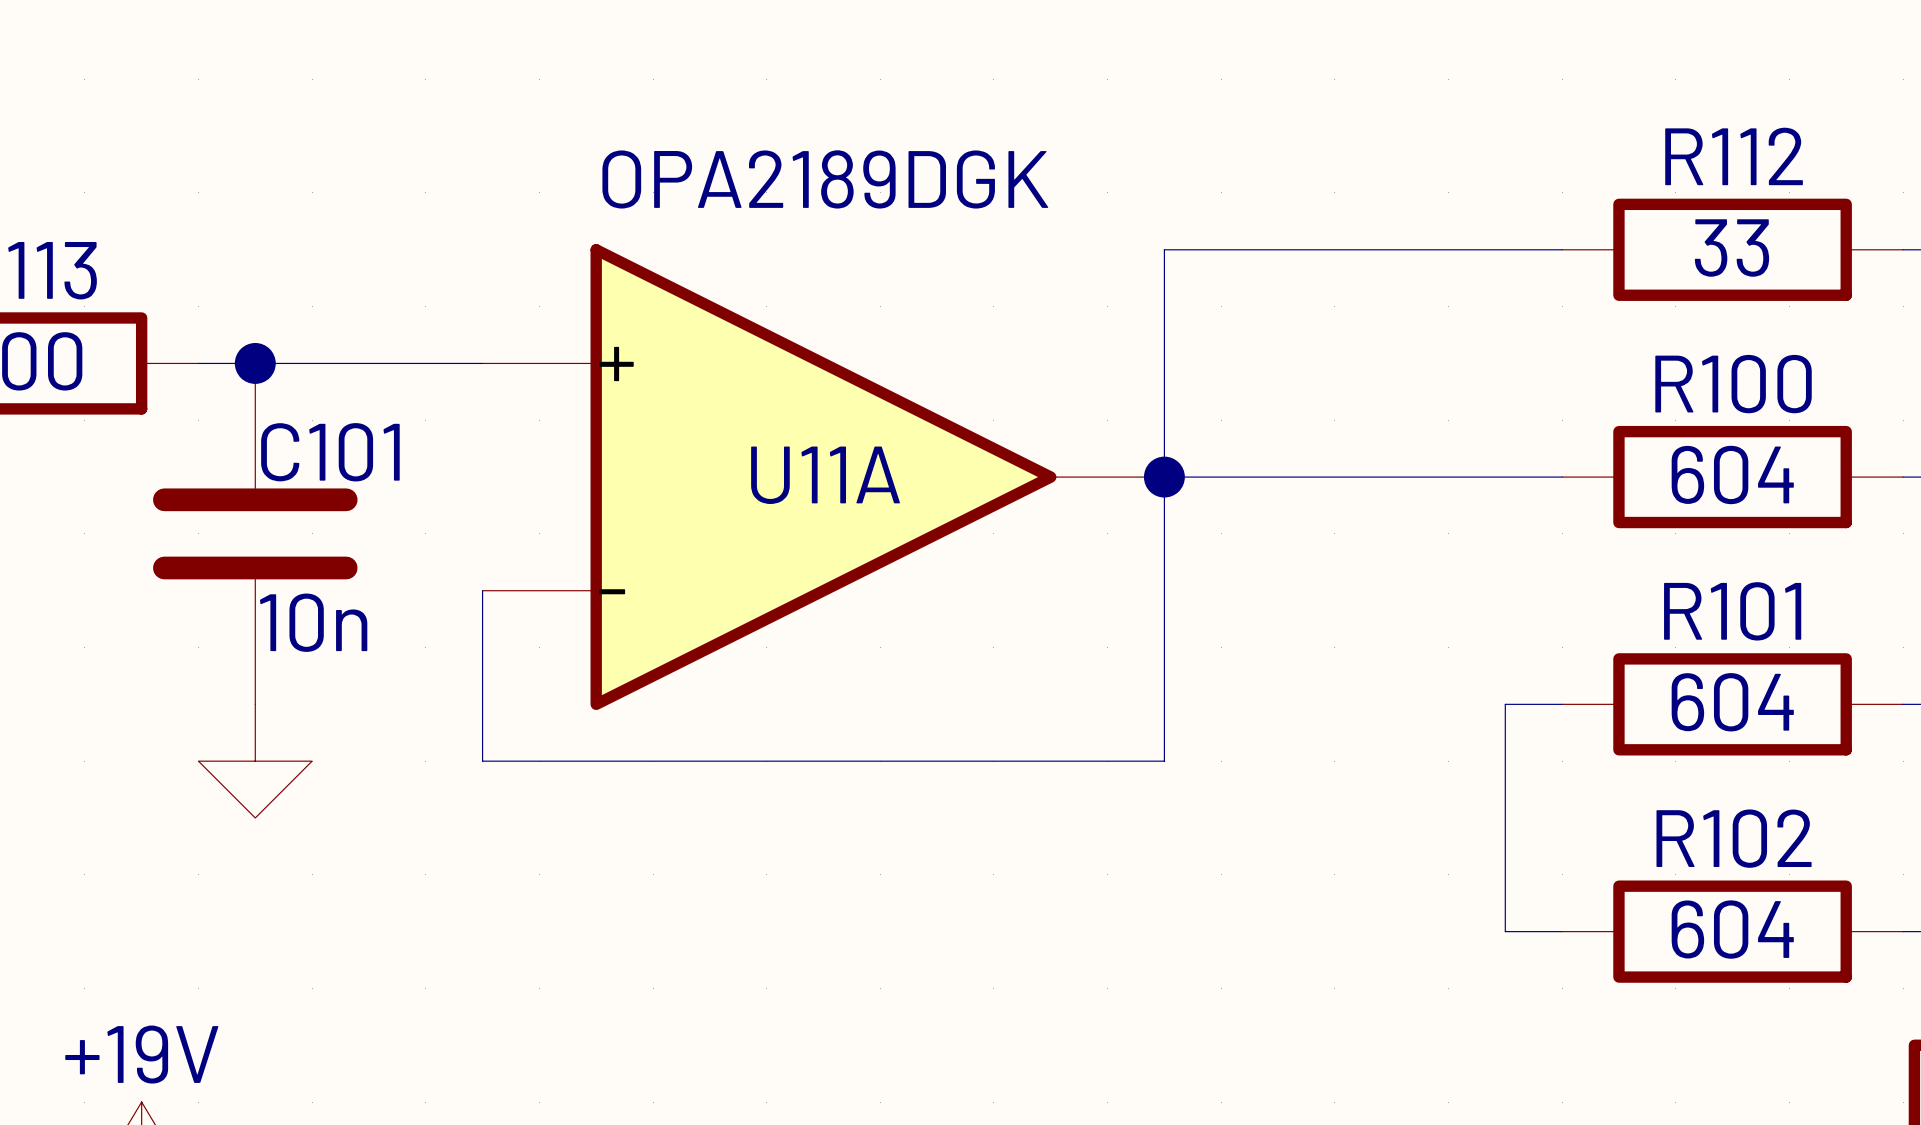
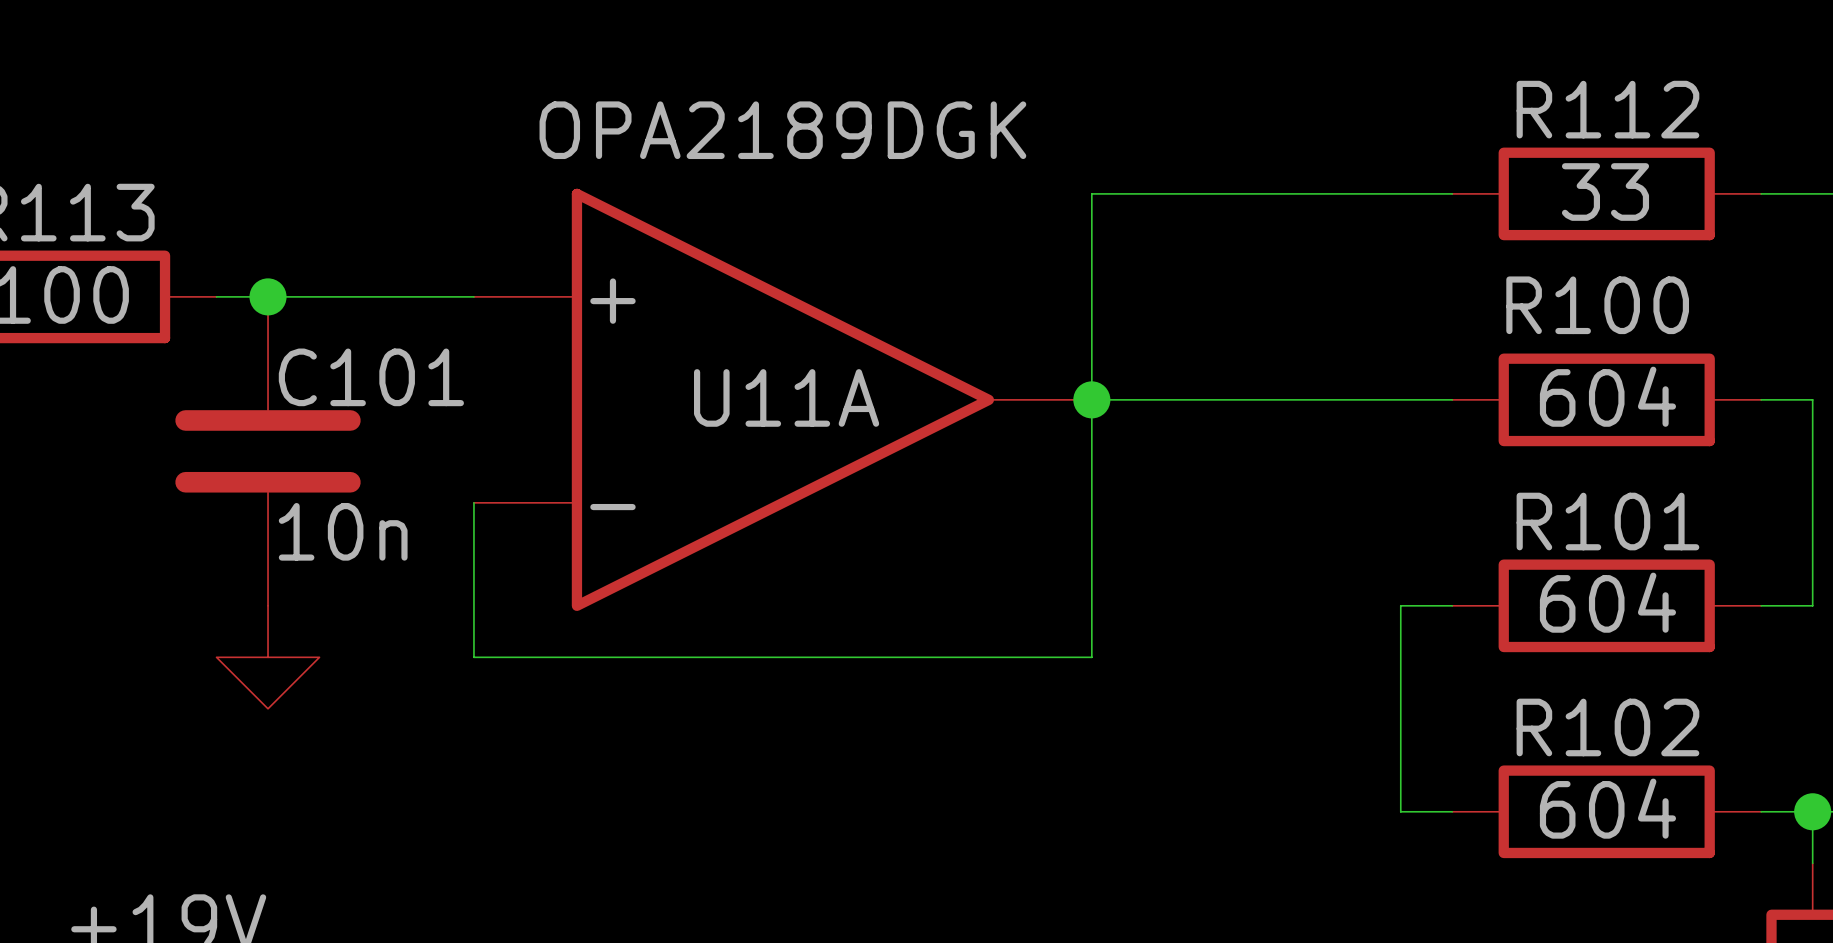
R100 name position: R100 (1733, 384) -> R100 (1597, 305)

